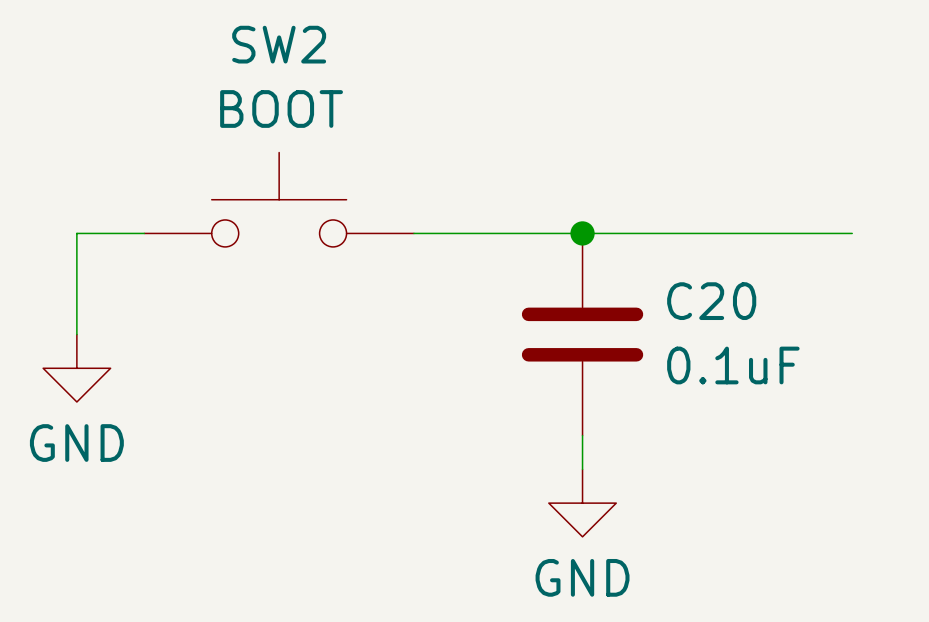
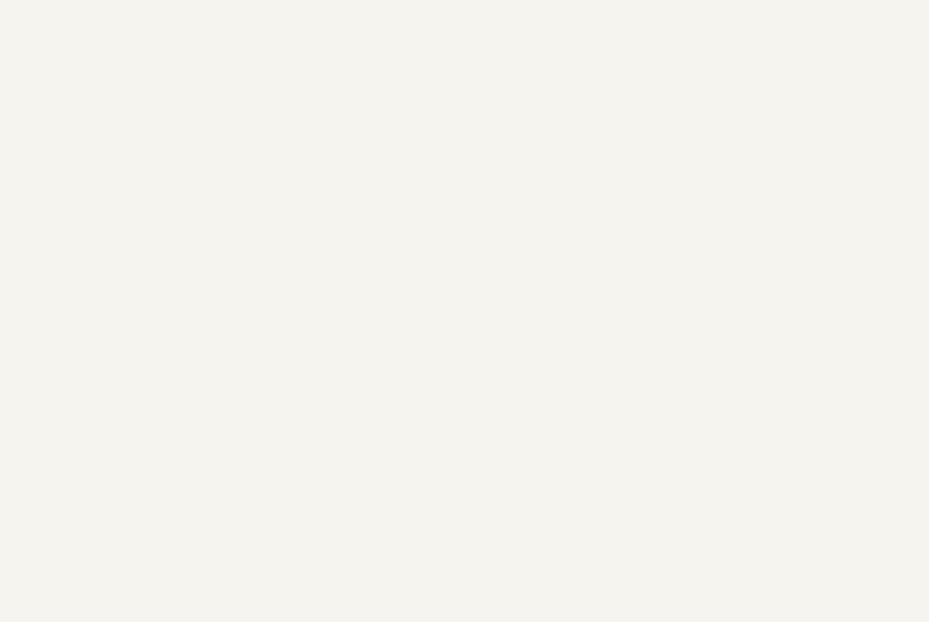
SW2: BOOT (279, 199) -> none
wire: (144, 233) (76, 233) (76, 334) -> none
wire: (413, 233) (852, 233) -> none
junction: (582, 233) -> none
C20: 0.1uF (582, 334) -> none
power symbol: GND (76, 368) -> none
wire: (582, 435) (582, 469) -> none
power symbol: GND (582, 503) -> none

